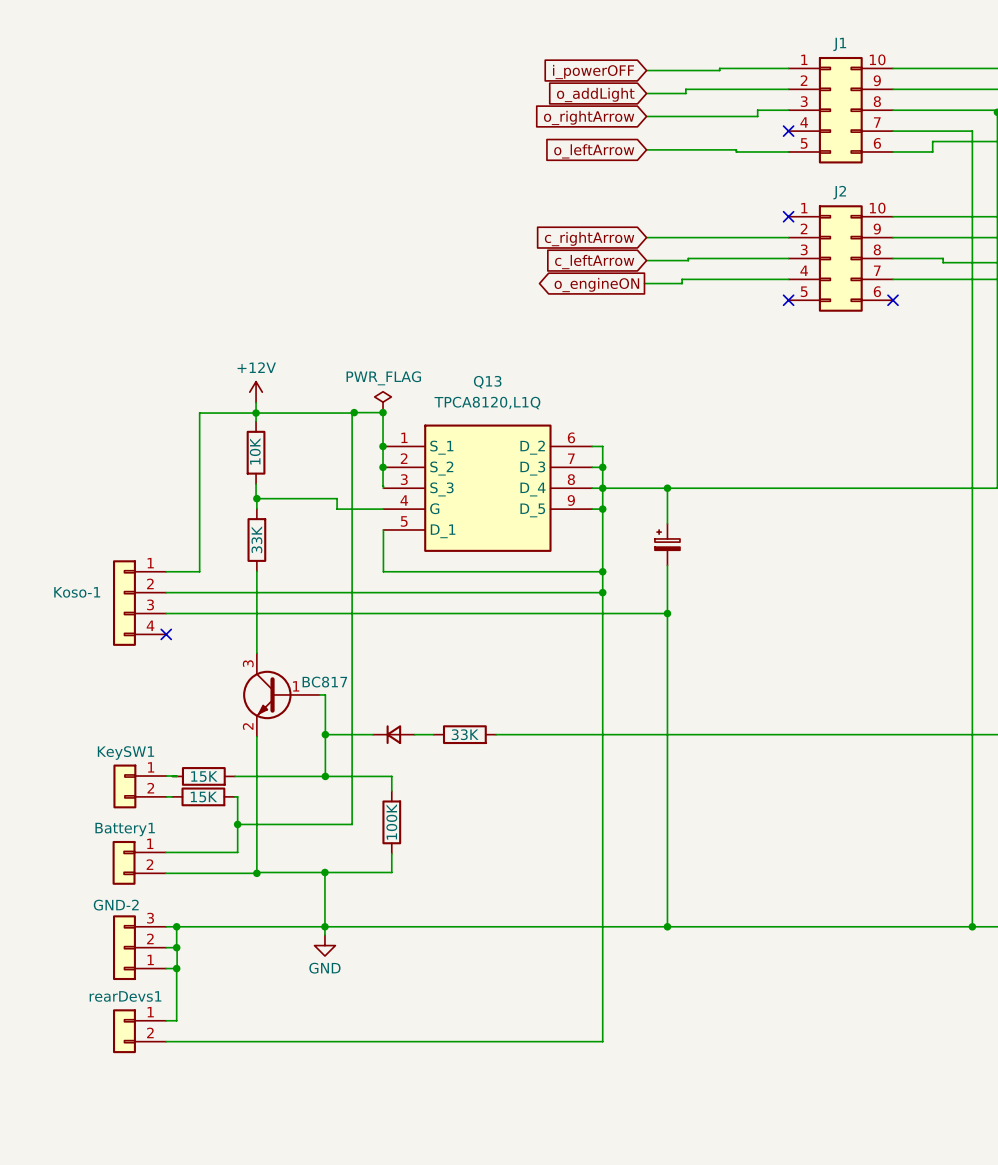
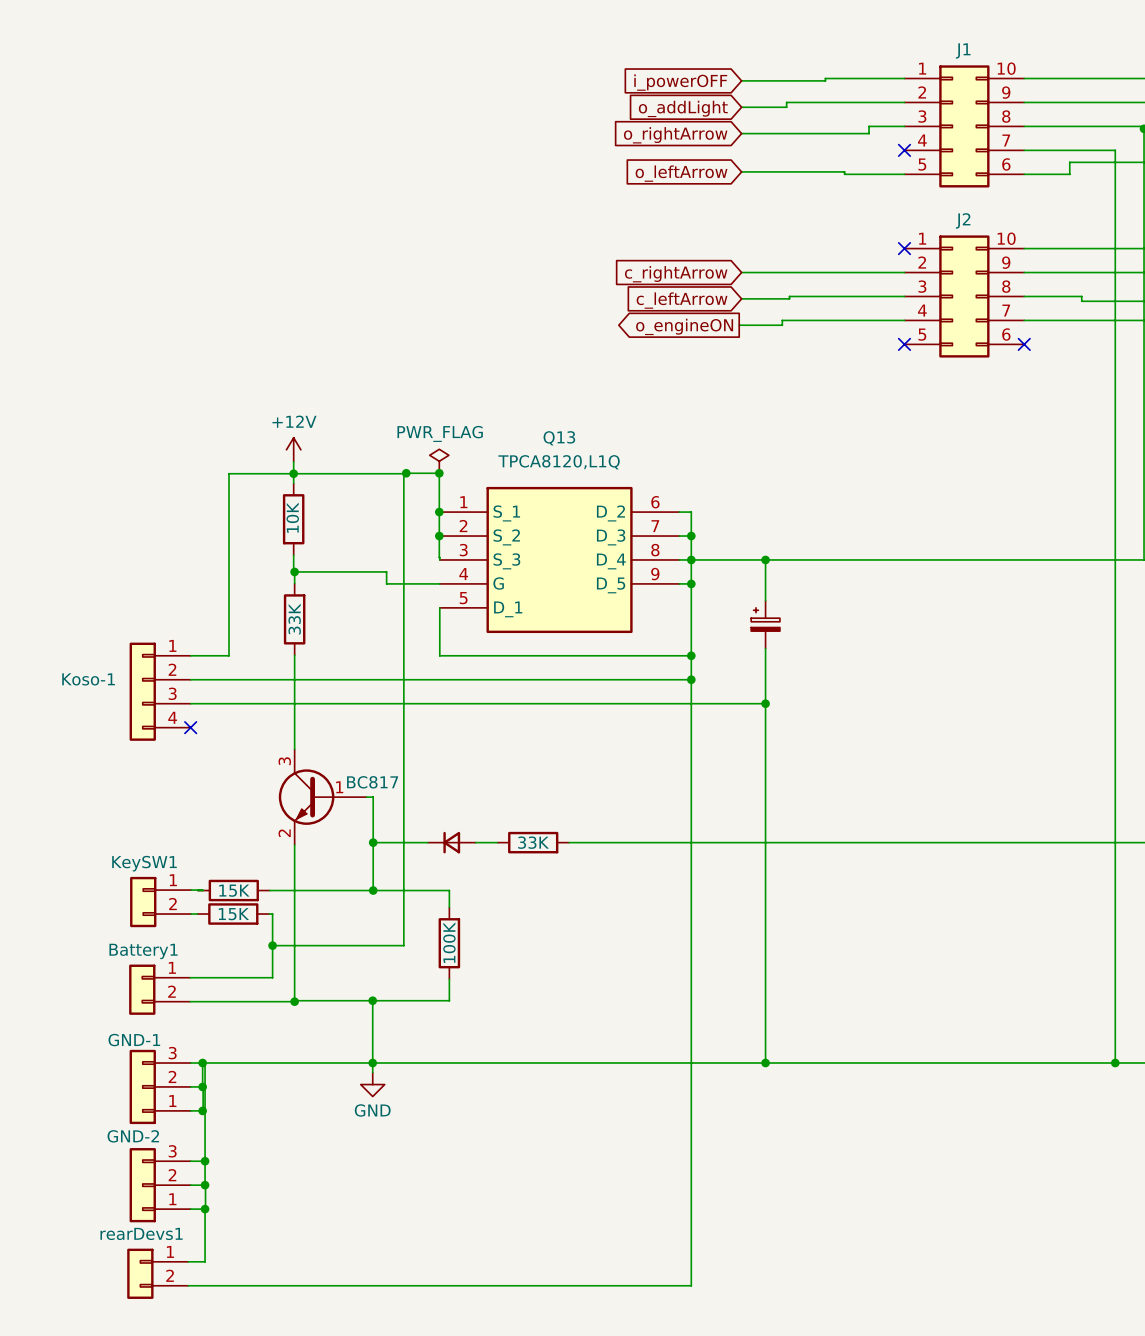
GND-2 name: GND-2 (116, 905) -> GND-1 (134, 1040)
wire: none -> (205, 1063) (205, 1209) (190, 1209)
wire: (176, 968) (176, 1020) (166, 1020) -> none
wire: none -> (190, 1161) (205, 1161)
junction: none -> (205, 1161)
rearDevs1 position: (139, 1031) -> (157, 1273)
GND-2: none -> (160, 1185)
wire: none -> (190, 1185) (205, 1185)
junction: none -> (205, 1185)
wire: (166, 1041) (602, 1041) -> (188, 1285) (691, 1285) (691, 1194)
wire: none -> (205, 1209) (205, 1261) (188, 1261)
junction: none -> (205, 1209)

